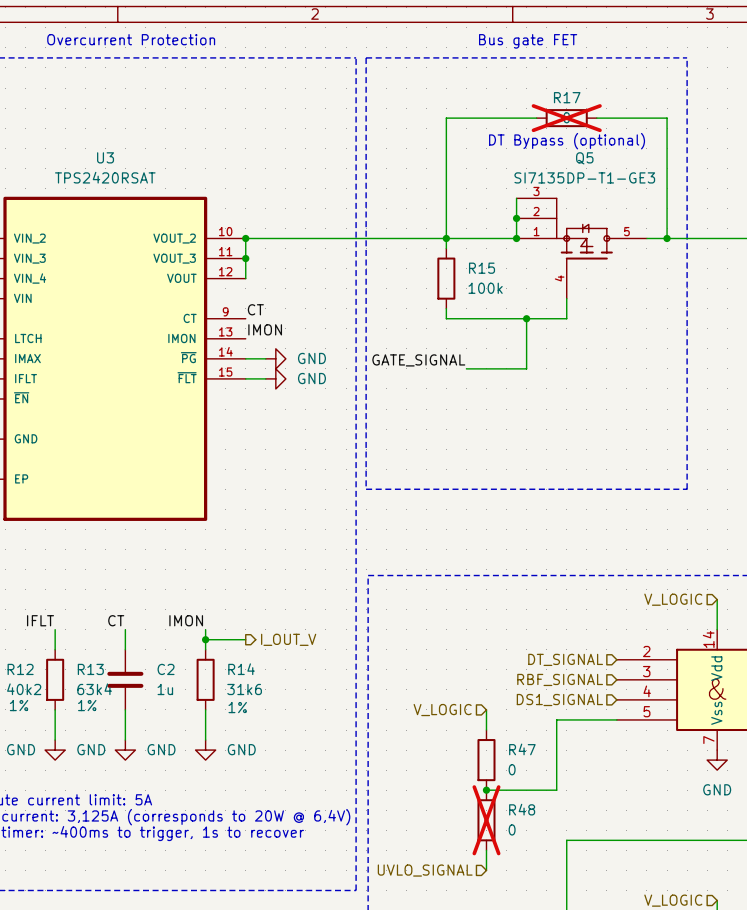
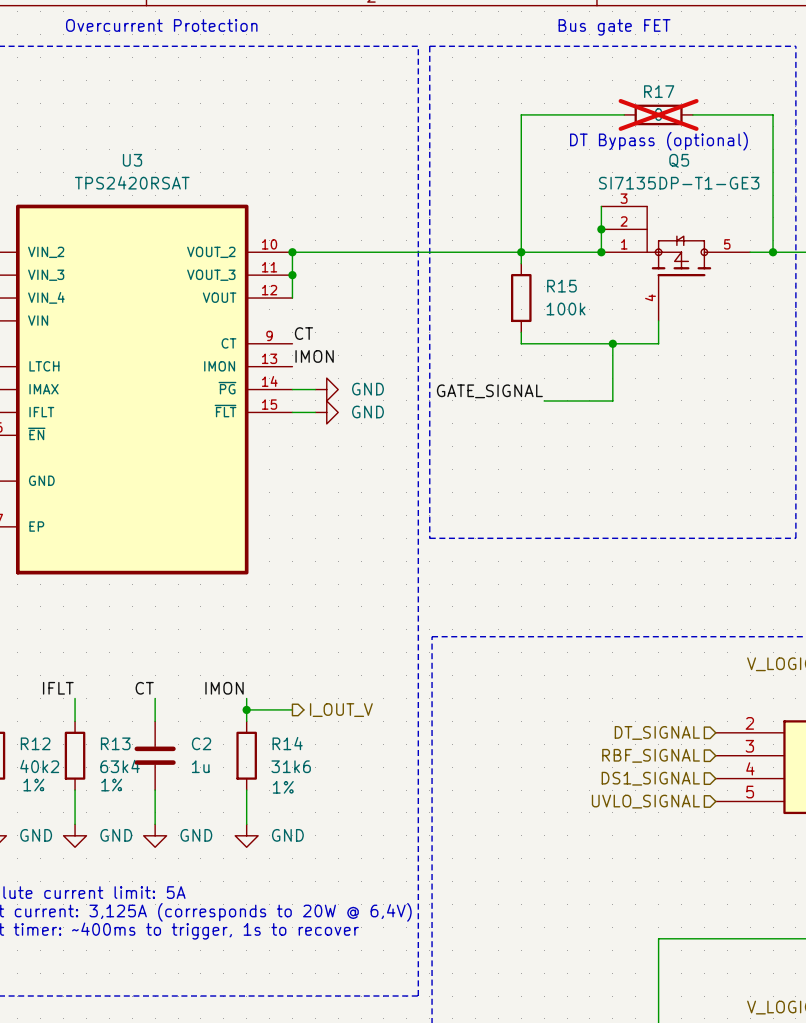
wire: (486, 709) (486, 730) -> none
hierarchical label: V_LOGIC (442, 710) -> none
wire: (616, 719) (556, 719) (556, 790) (486, 790) -> none
hierarchical label: none -> UVLO_SIGNAL (645, 801)
R47: 0 (486, 760) -> none
junction: (486, 790) -> none
R48: 0 (486, 820) -> none
wire: (486, 850) (486, 870) -> none
hierarchical label: UVLO_SIGNAL (425, 870) -> none

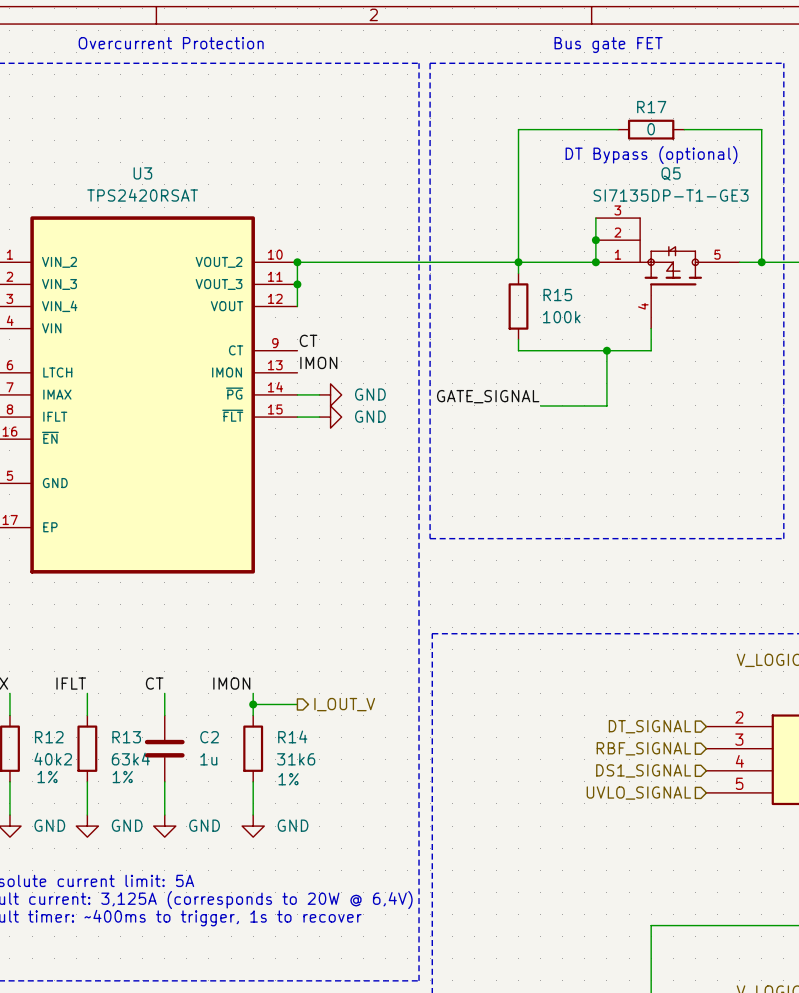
R17 do-not-place cross: (658, 114) -> none

